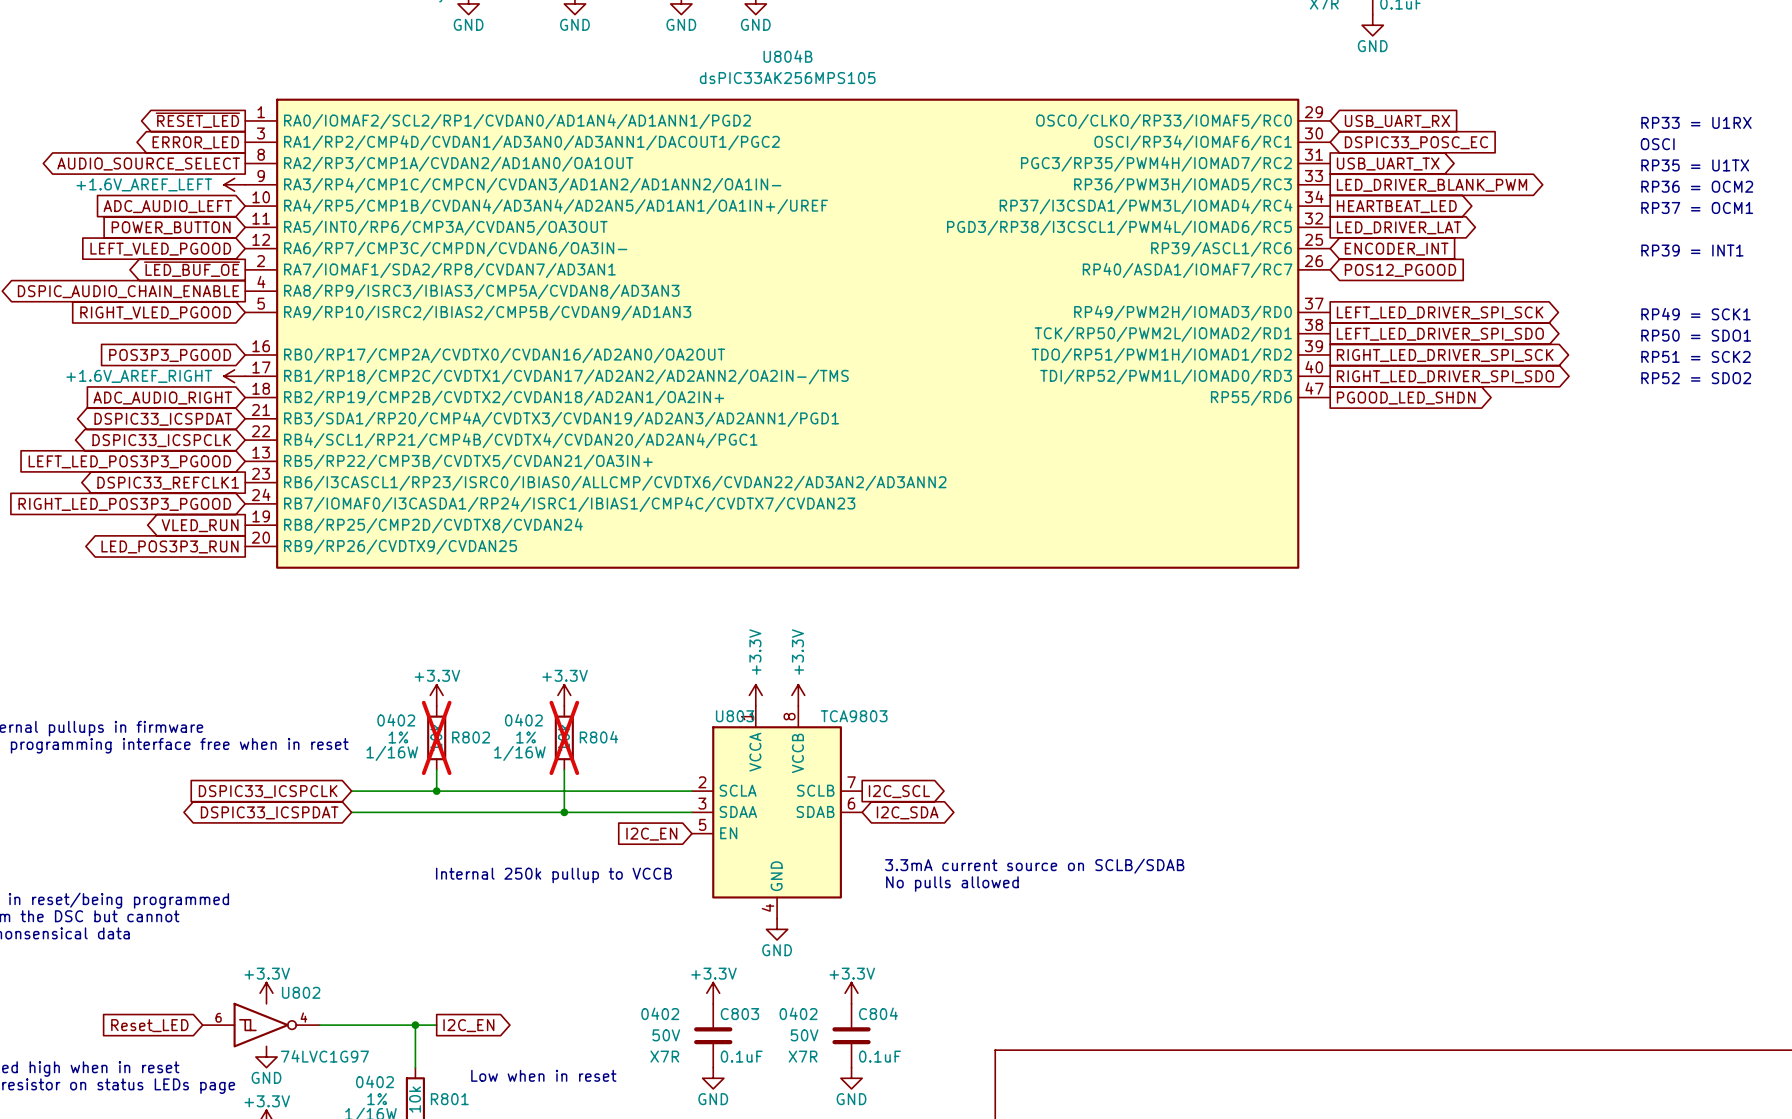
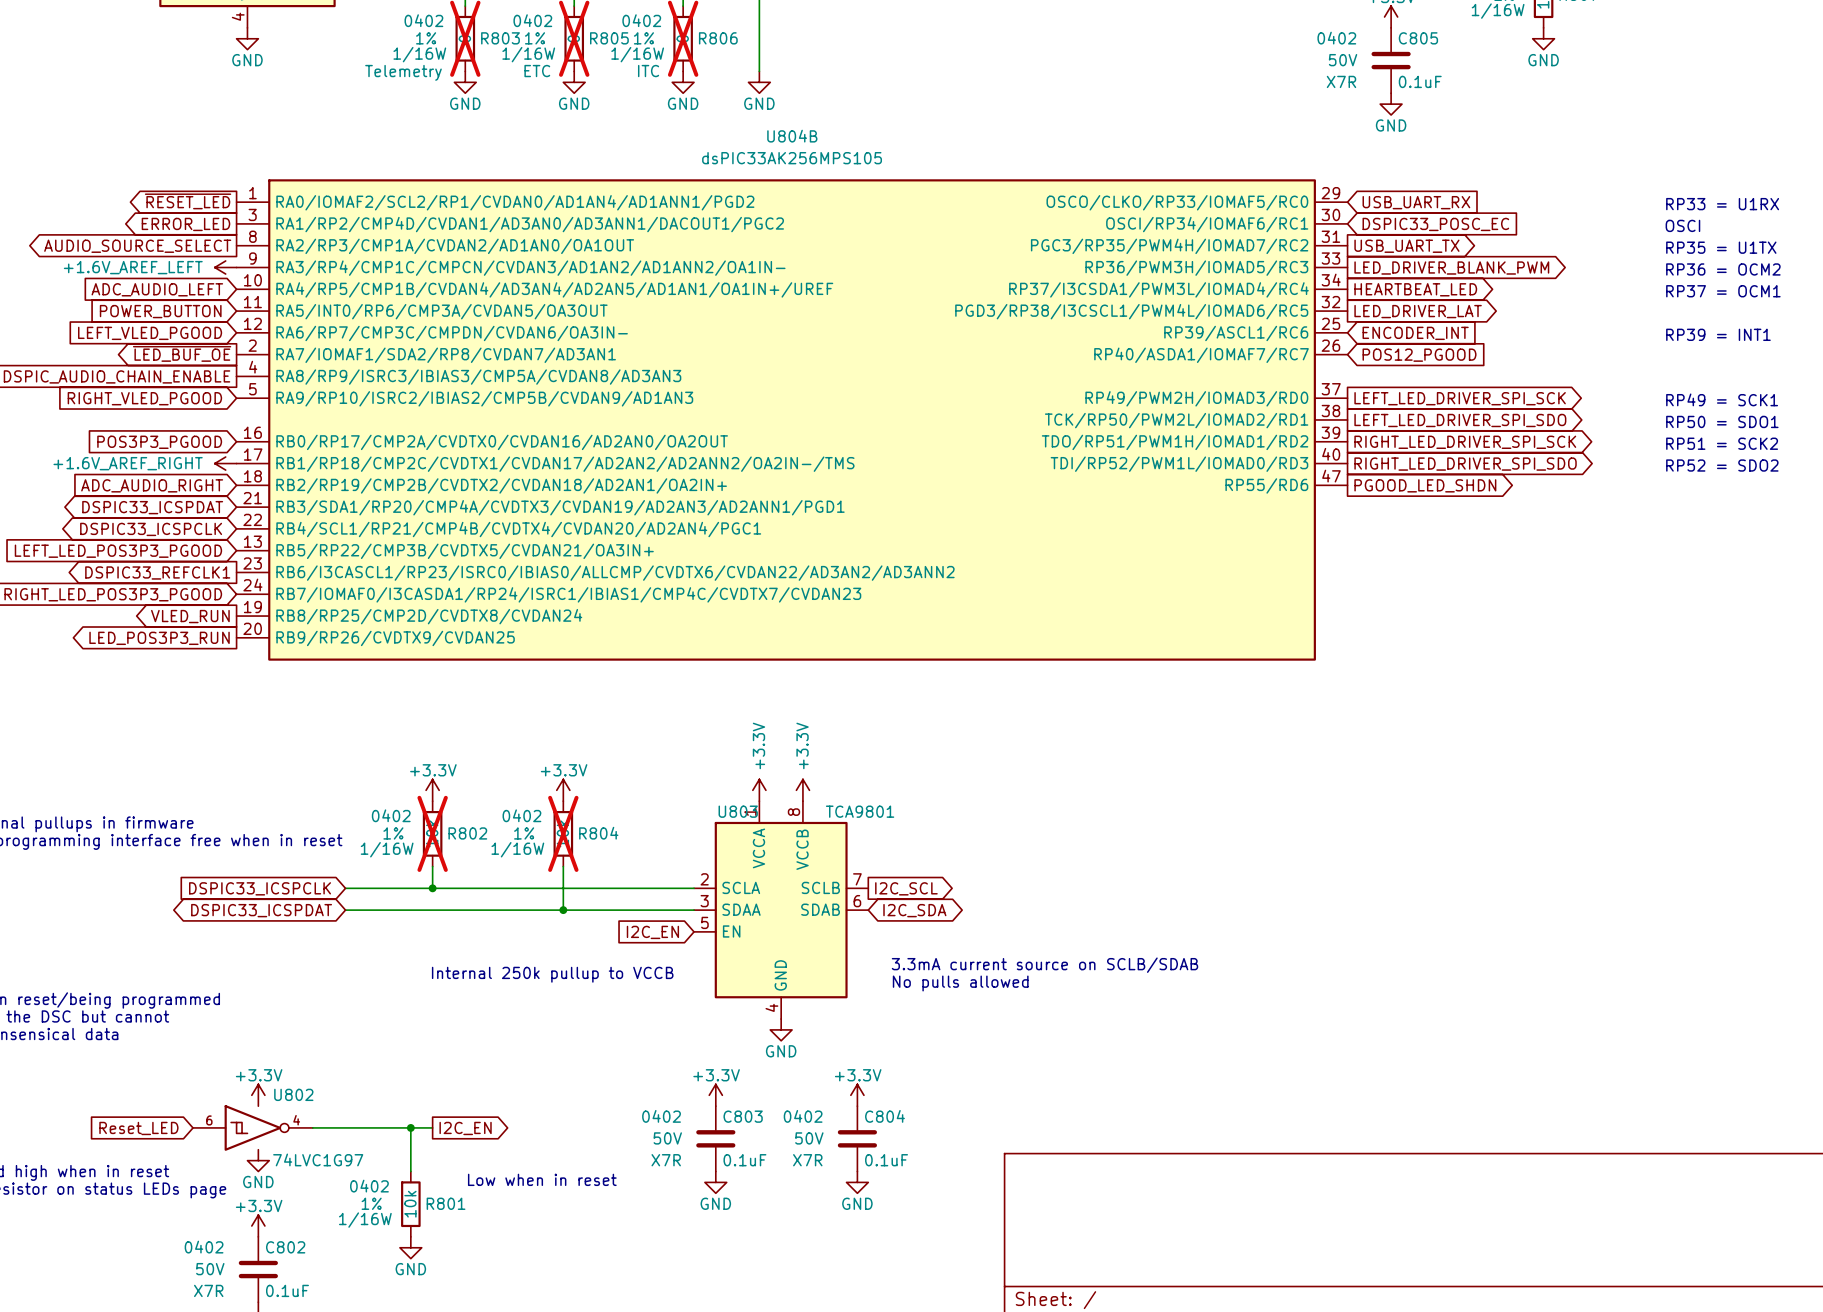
U803 value: TCA9803 (854, 716) -> TCA9801 (860, 811)

